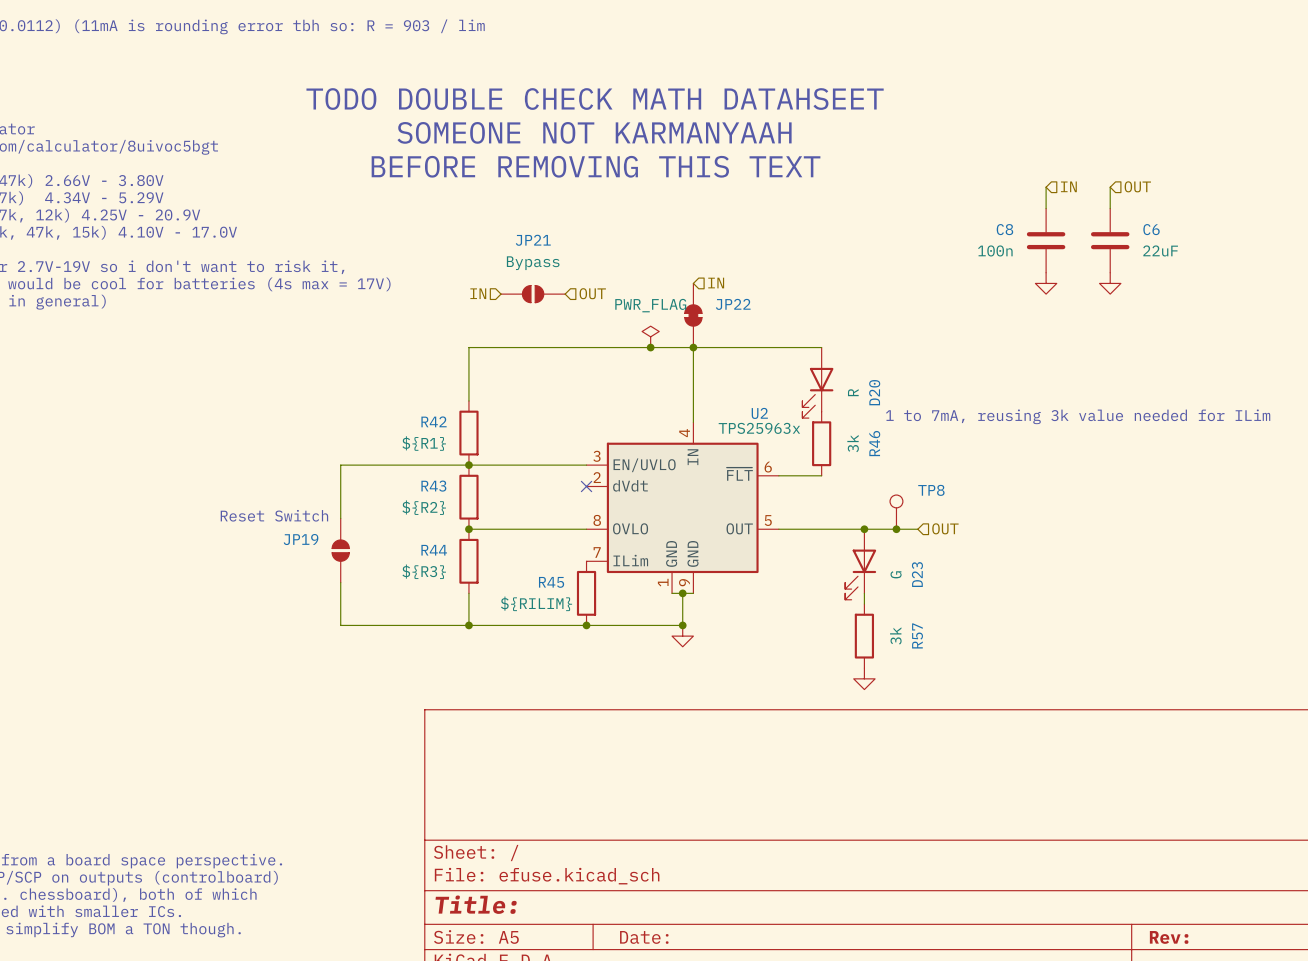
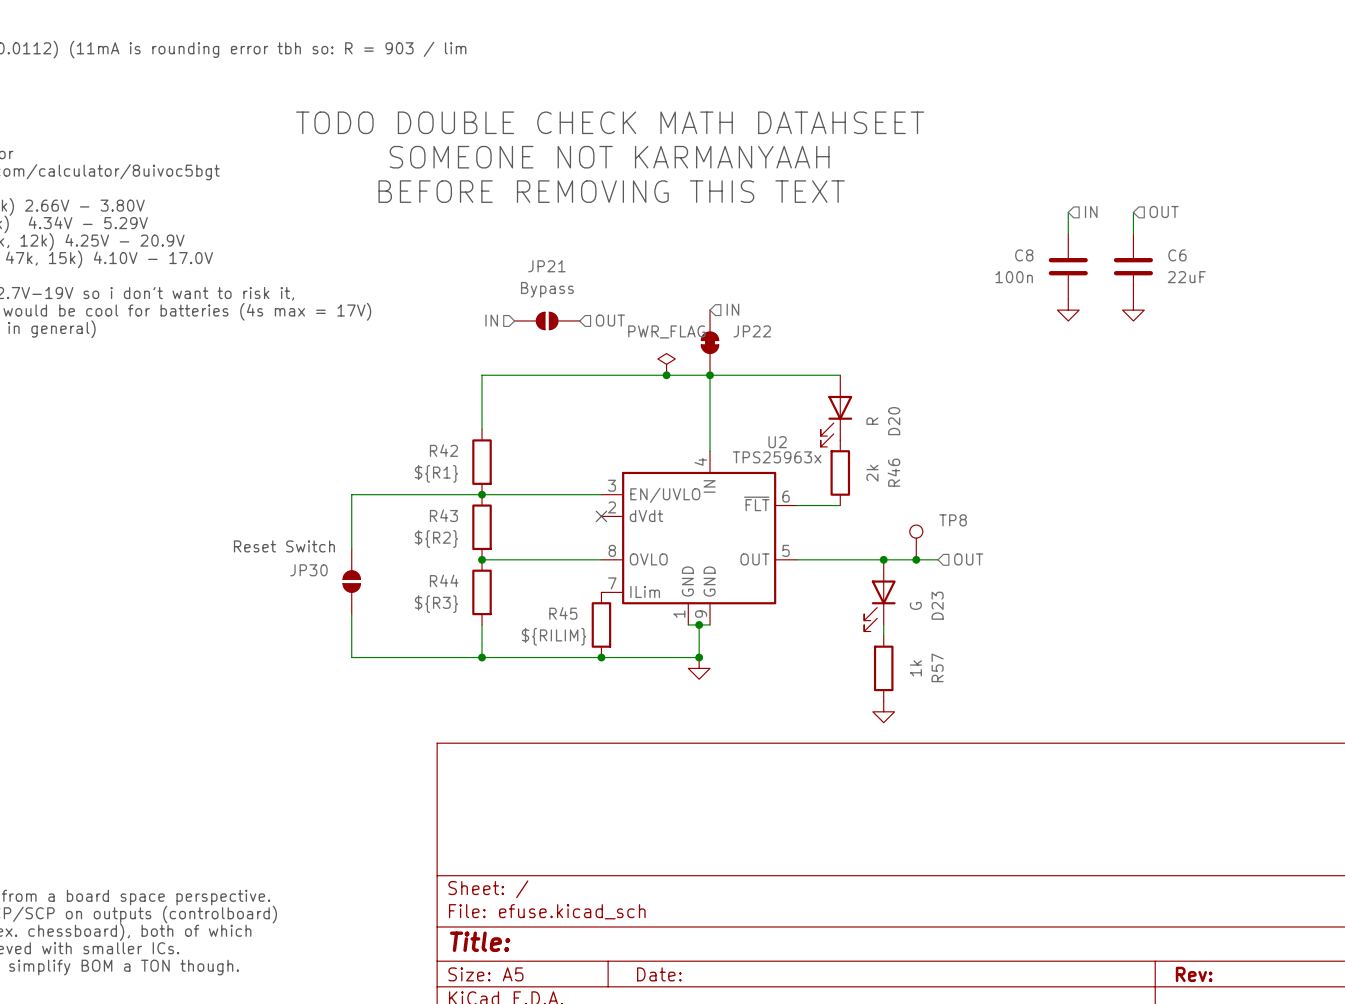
text: 1 to 7mA, reusing 3k value needed for ILim (1078, 416) -> none
R46 value: 3k (853, 443) -> 2k (872, 473)
JP19 name: JP19 (301, 539) -> JP30 (309, 570)
R57 value: 3k (895, 635) -> 1k (915, 668)

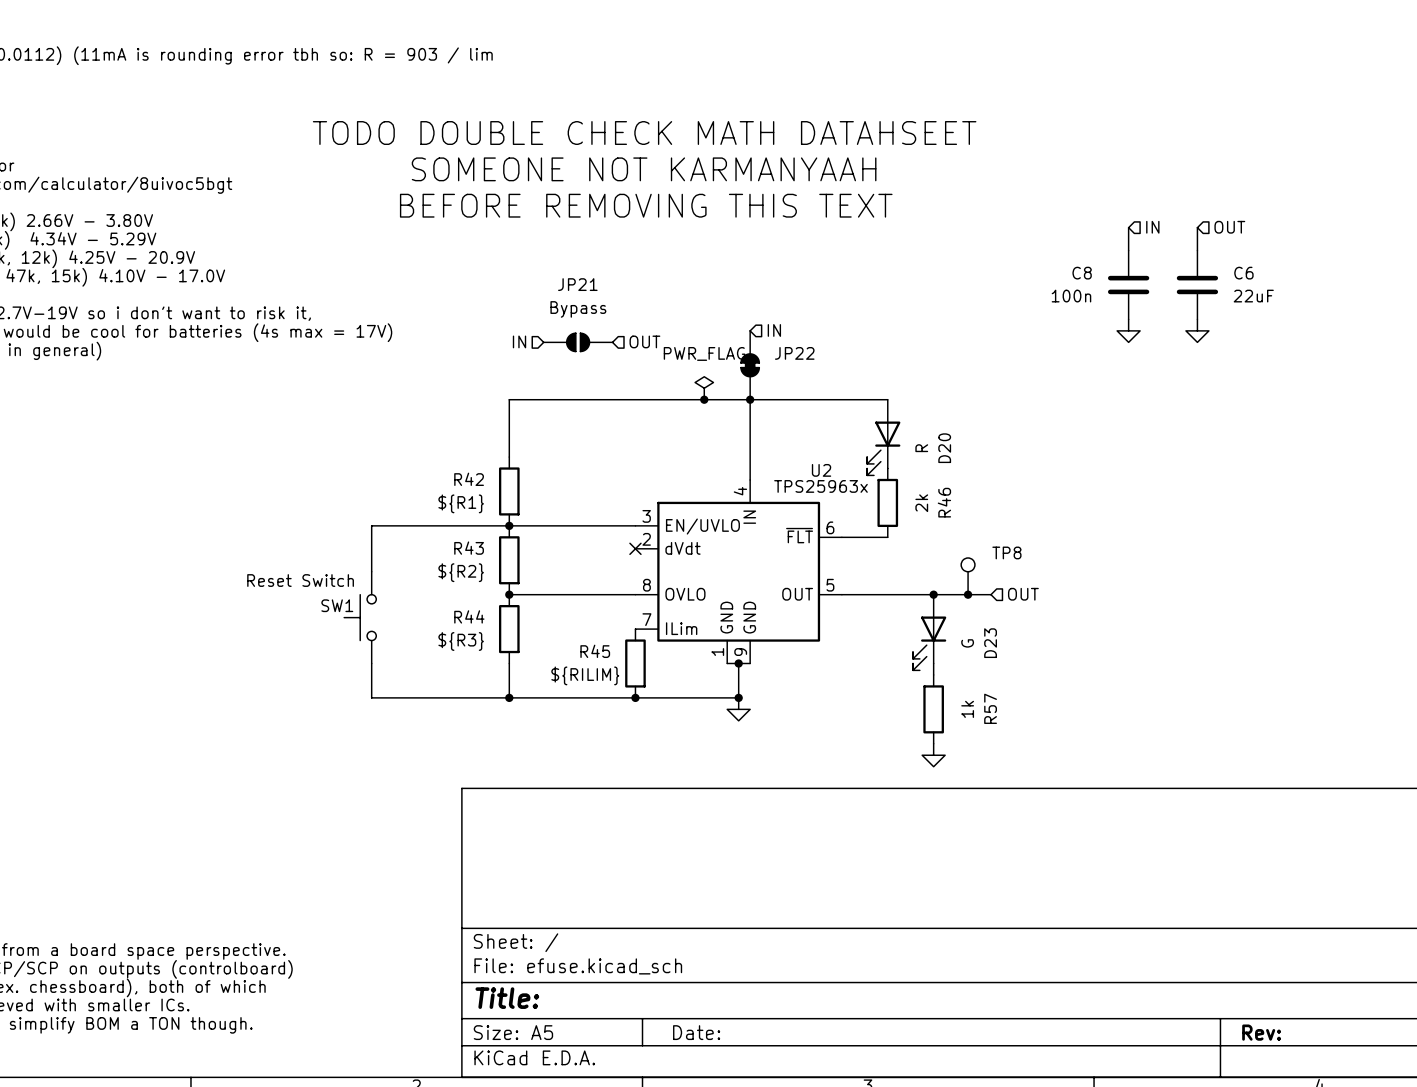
SW1: none -> (360, 617)
JP30: (351, 581) -> none

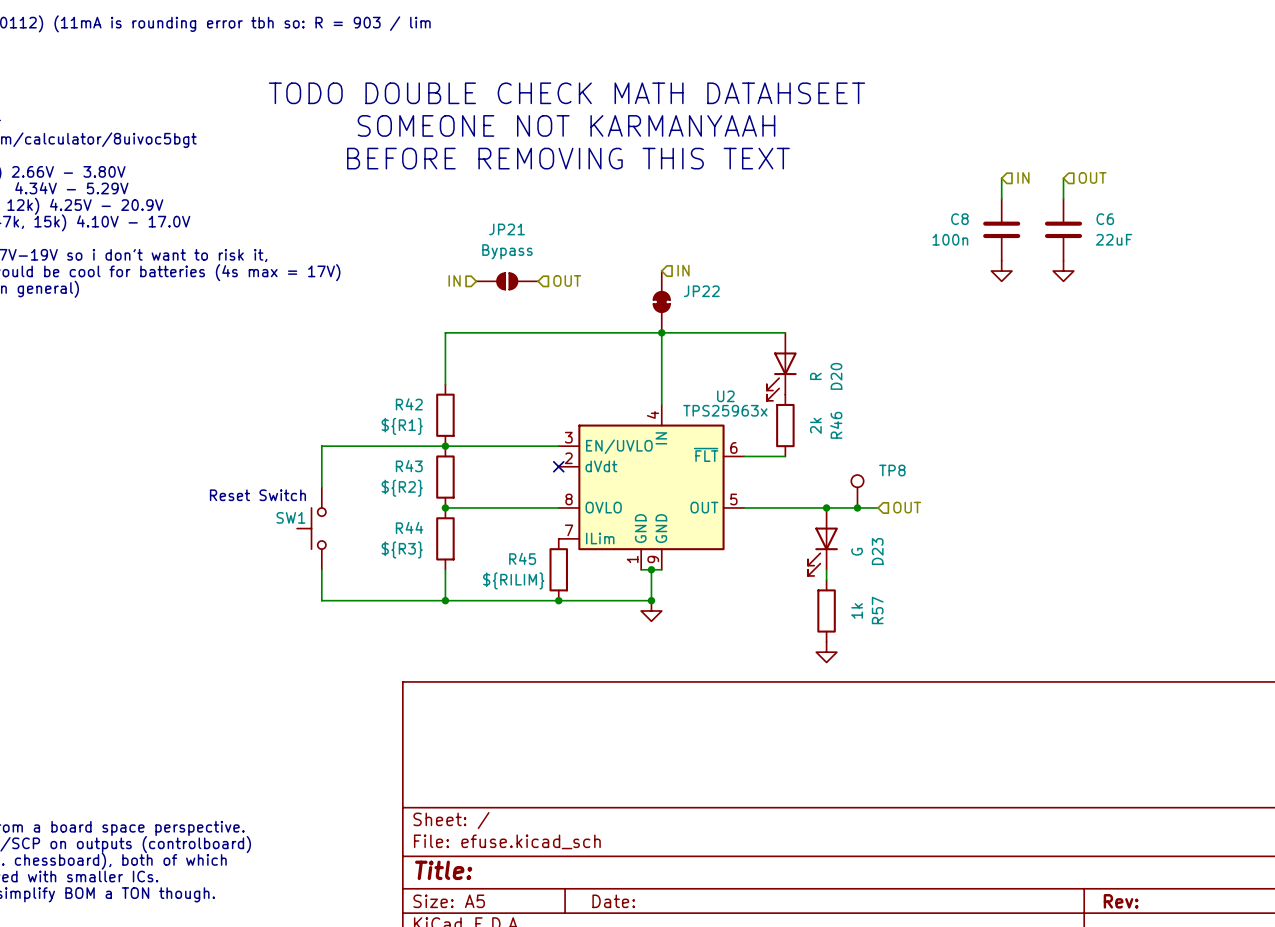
power symbol: PWR_FLAG (704, 388) -> none
junction: (704, 399) -> none

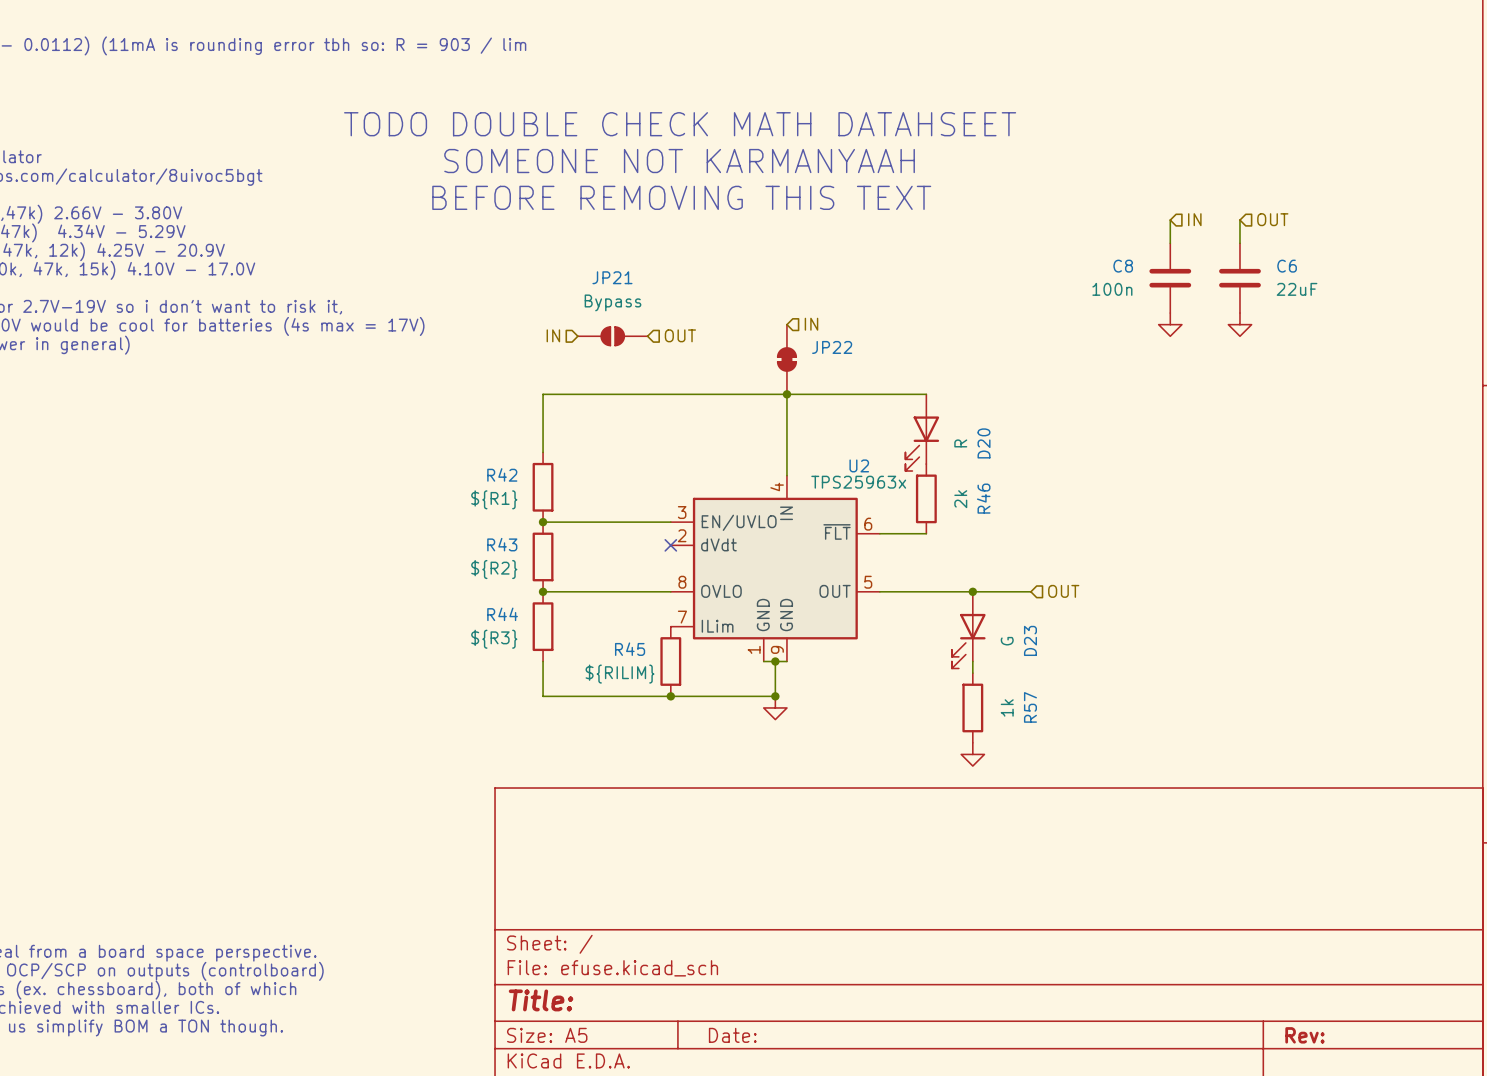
wire: (445, 446) (321, 446) (321, 487) -> none
TP8: (857, 491) -> none
text: Reset Switch (257, 495) -> none
junction: (857, 507) -> none
SW1: (311, 528) -> none
wire: (321, 569) (321, 600) (445, 600) -> none
junction: (445, 600) -> none

